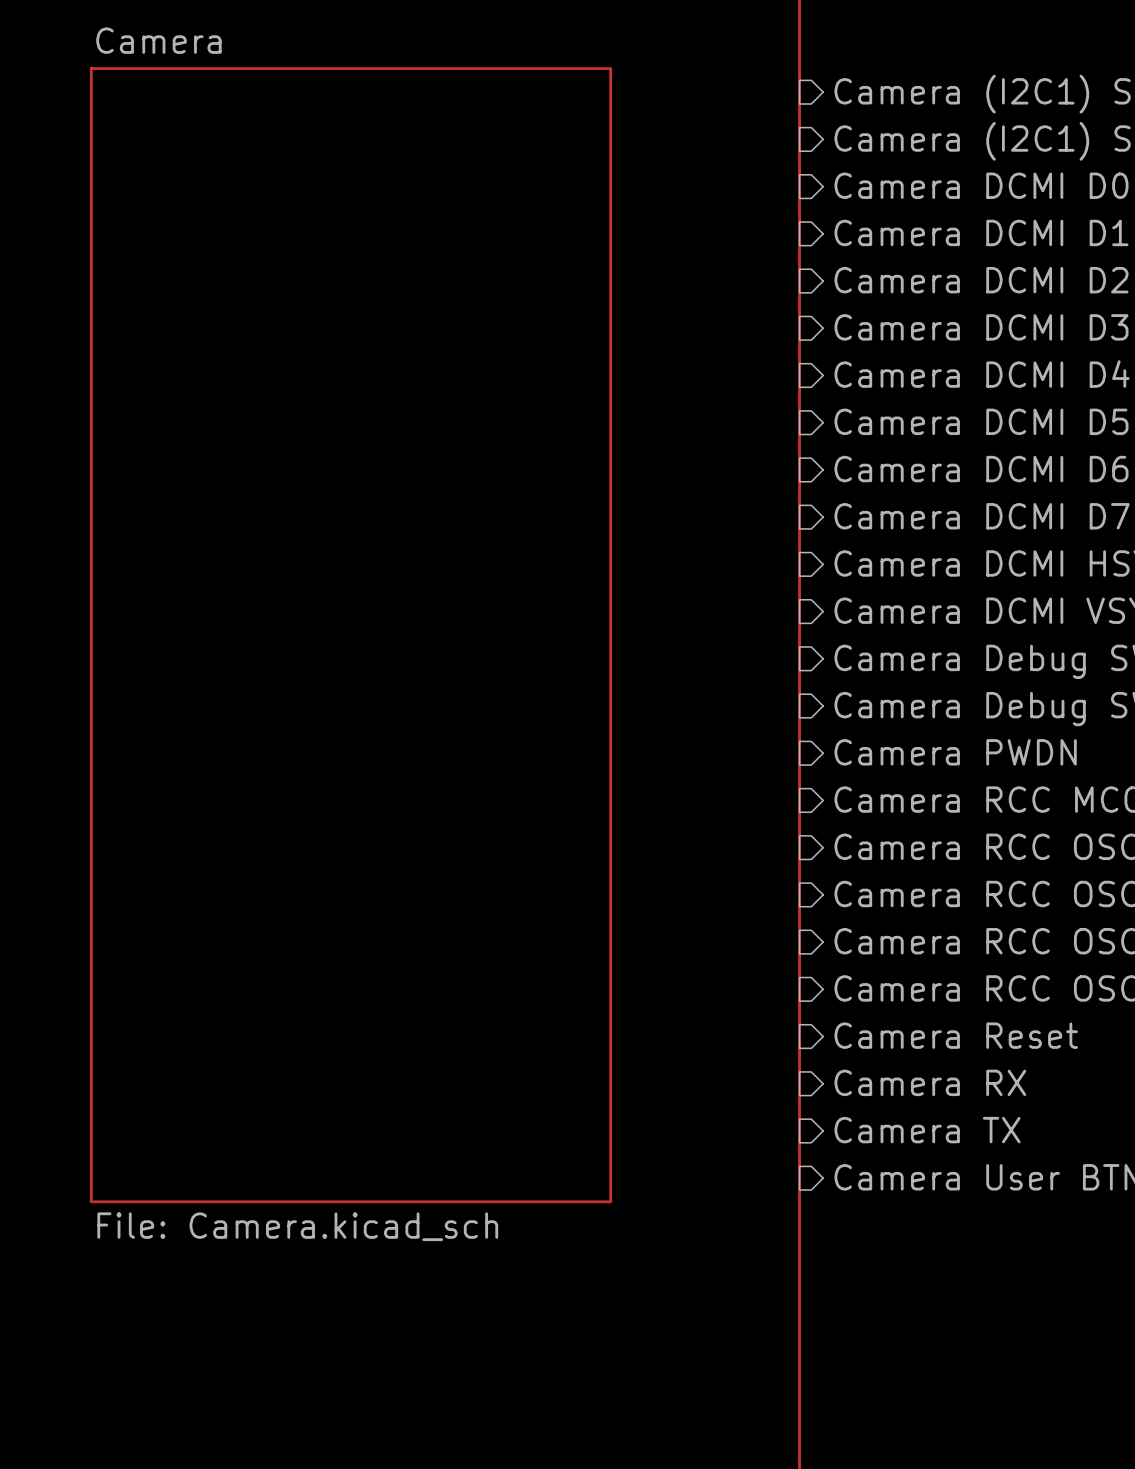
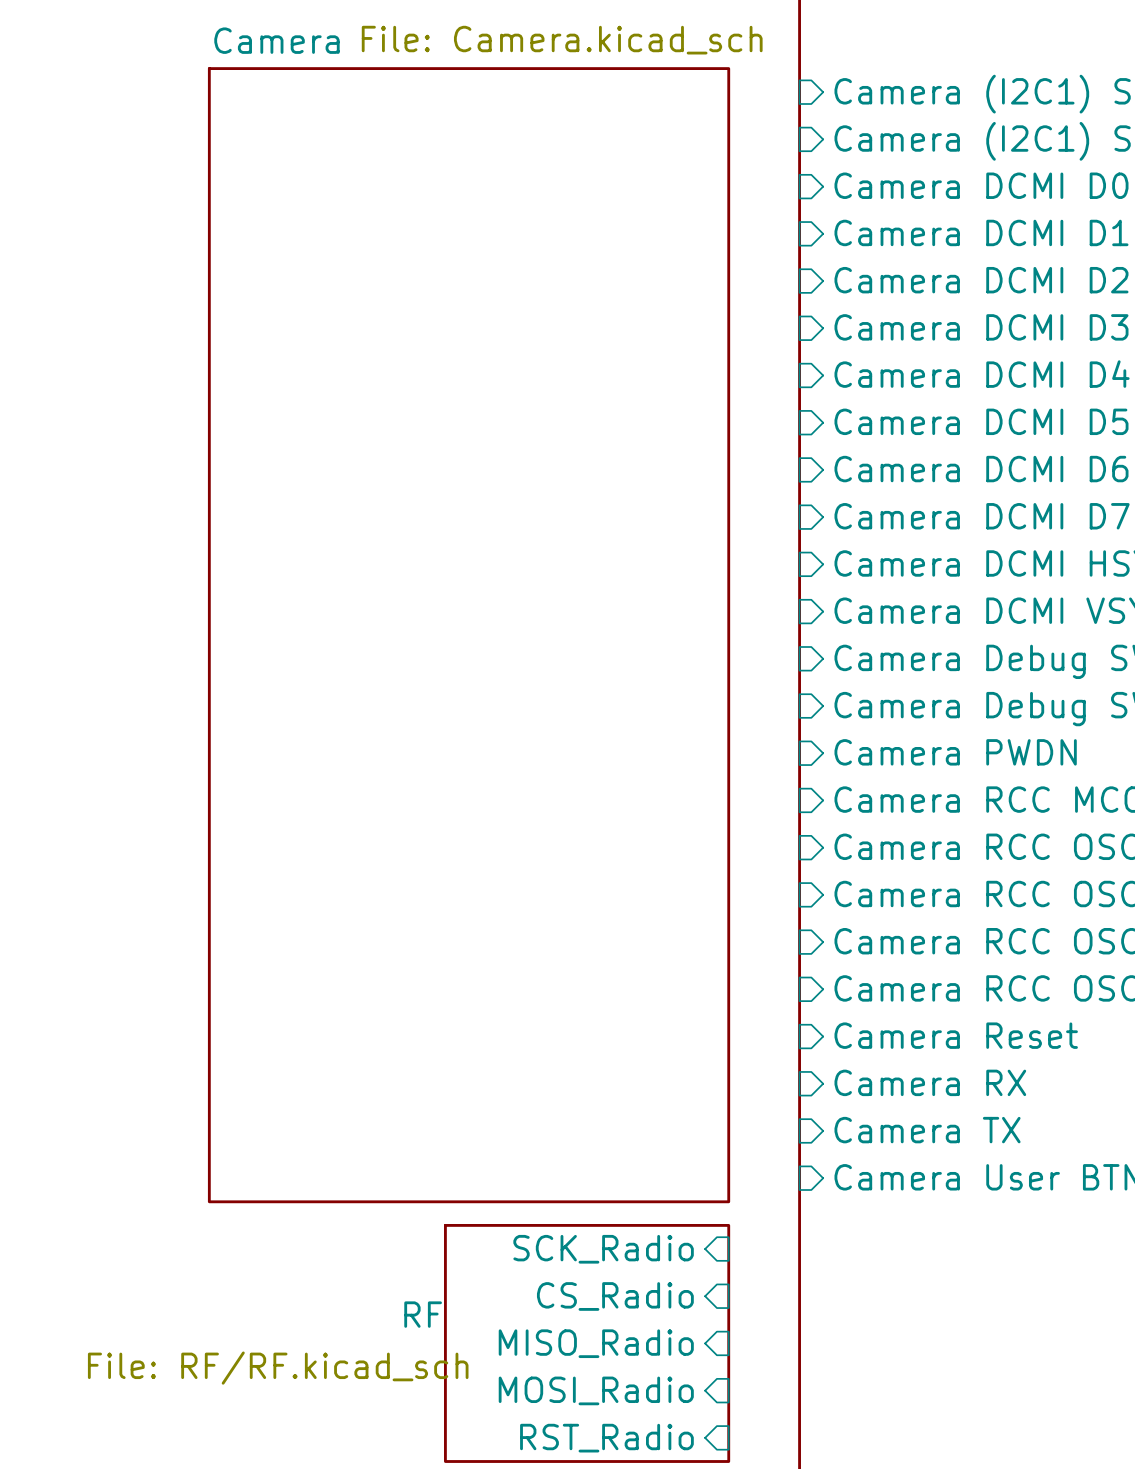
sheet Camera position: (350, 635) -> (469, 635)
sheet Camera value position: File: Camera.kicad_sch (297, 1226) -> File: Camera.kicad_sch (562, 40)
sheet pin: none -> SCK_Radio (603, 1249)
sheet pin: none -> CS_Radio (615, 1296)
sheet RF: none -> File: RF/RF.kicad_sch (587, 1343)
sheet pin: none -> MISO_Radio (596, 1343)
sheet pin: none -> MOSI_Radio (596, 1390)
sheet pin: none -> RST_Radio (606, 1438)

